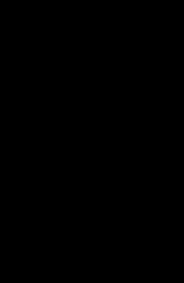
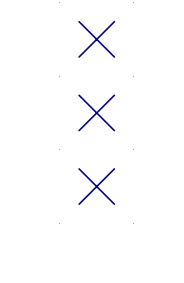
no-connect mark: none -> (96, 39)
no-connect mark: none -> (96, 112)
no-connect mark: none -> (96, 186)

